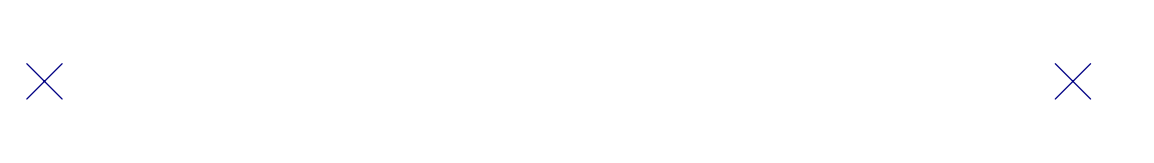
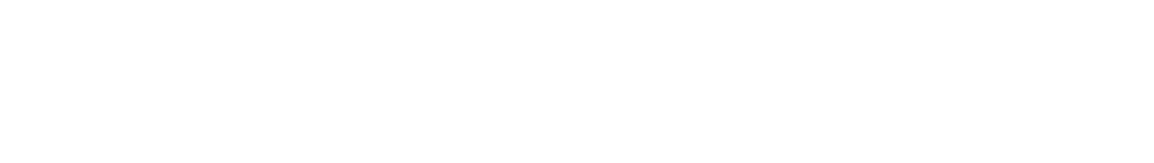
no-connect mark: (44, 81) -> none
no-connect mark: (1072, 81) -> none

